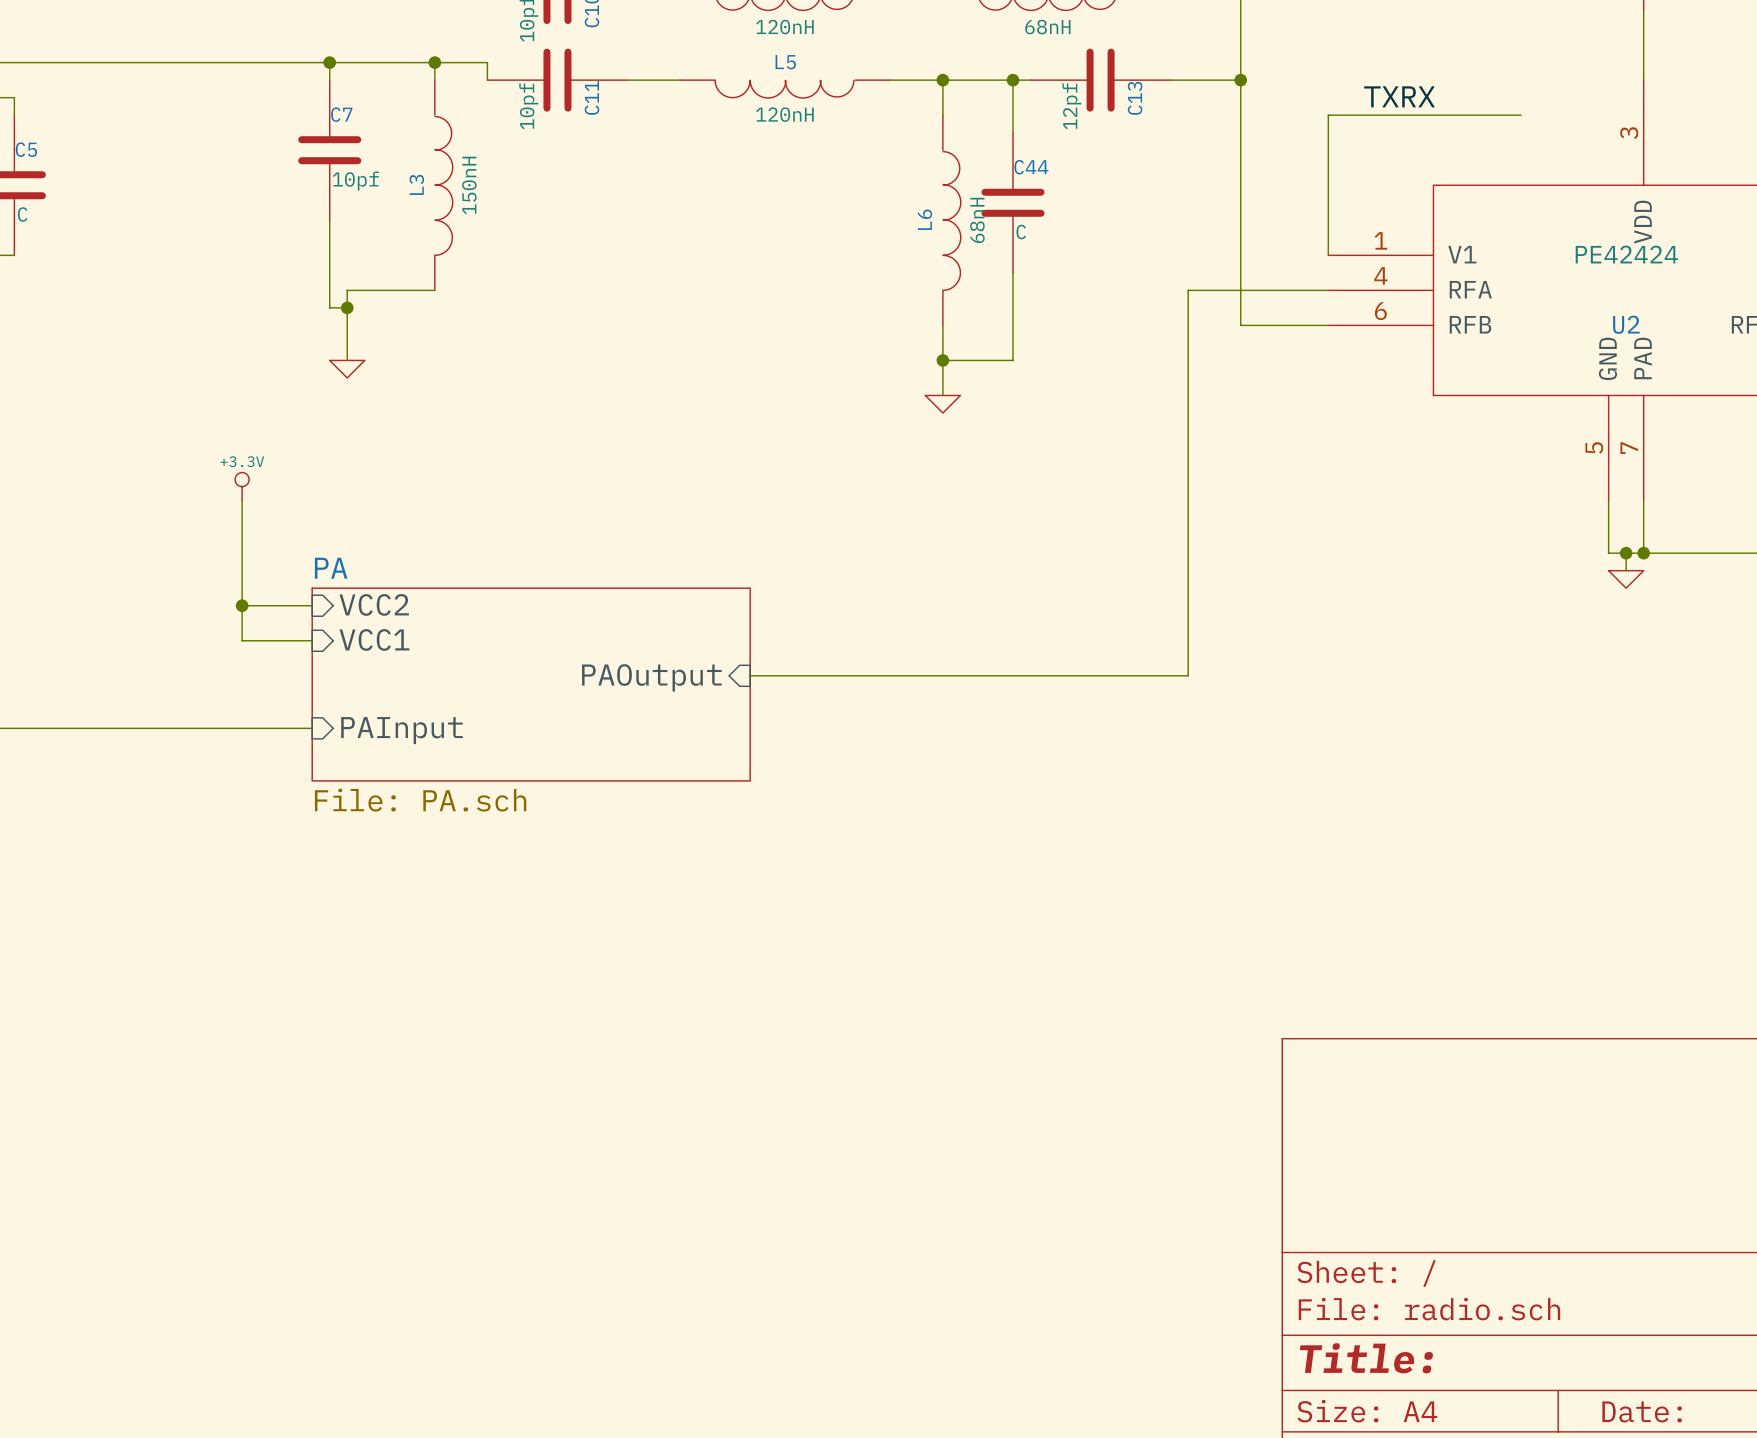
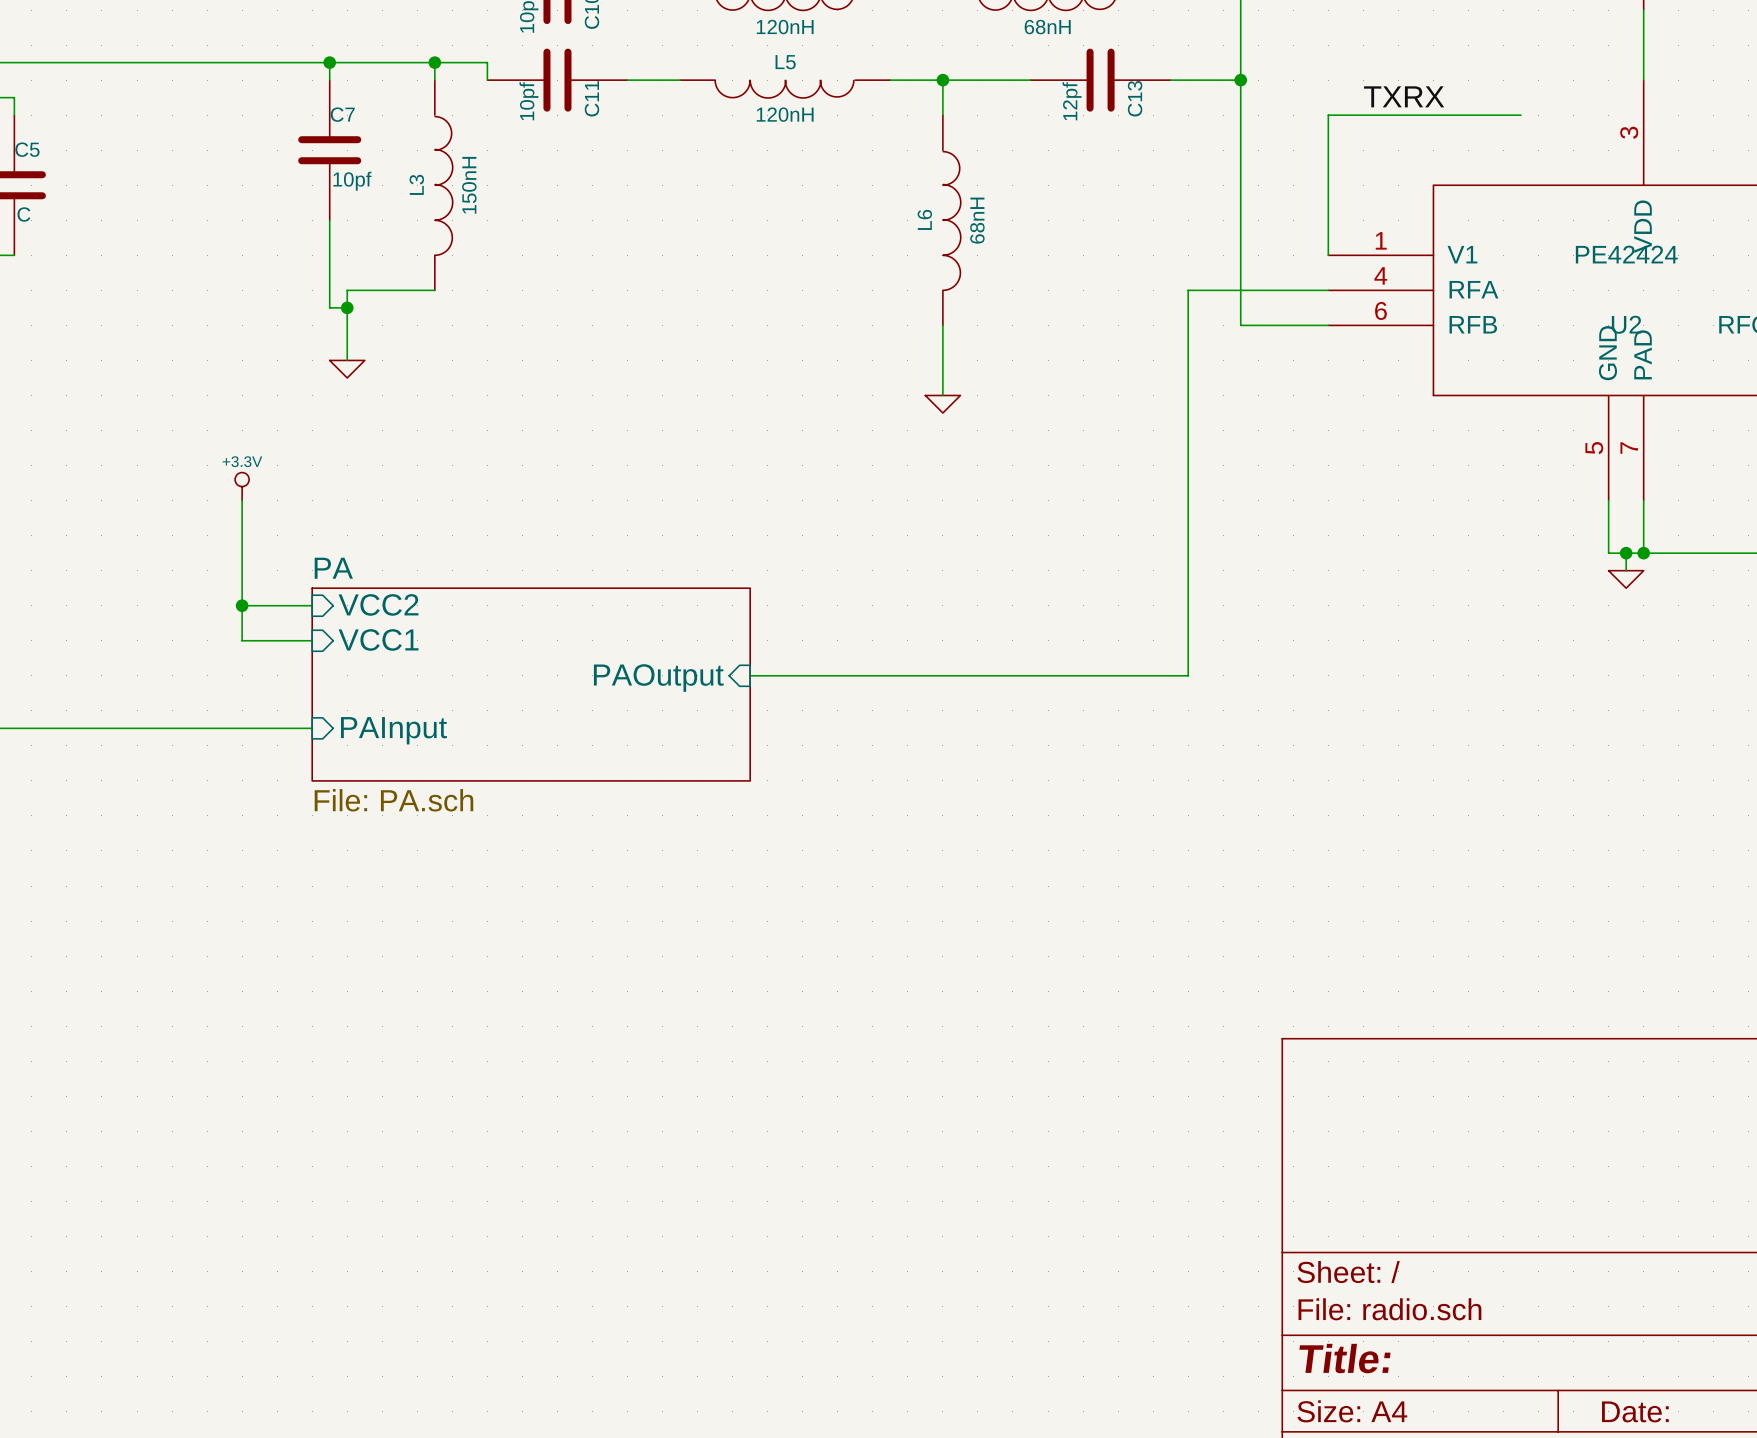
wire: (1012, 80) (1012, 132) -> none
junction: (1012, 80) -> none
C44: C (1012, 202) -> none
wire: (1012, 272) (1012, 360) (942, 360) -> none
junction: (942, 360) -> none

